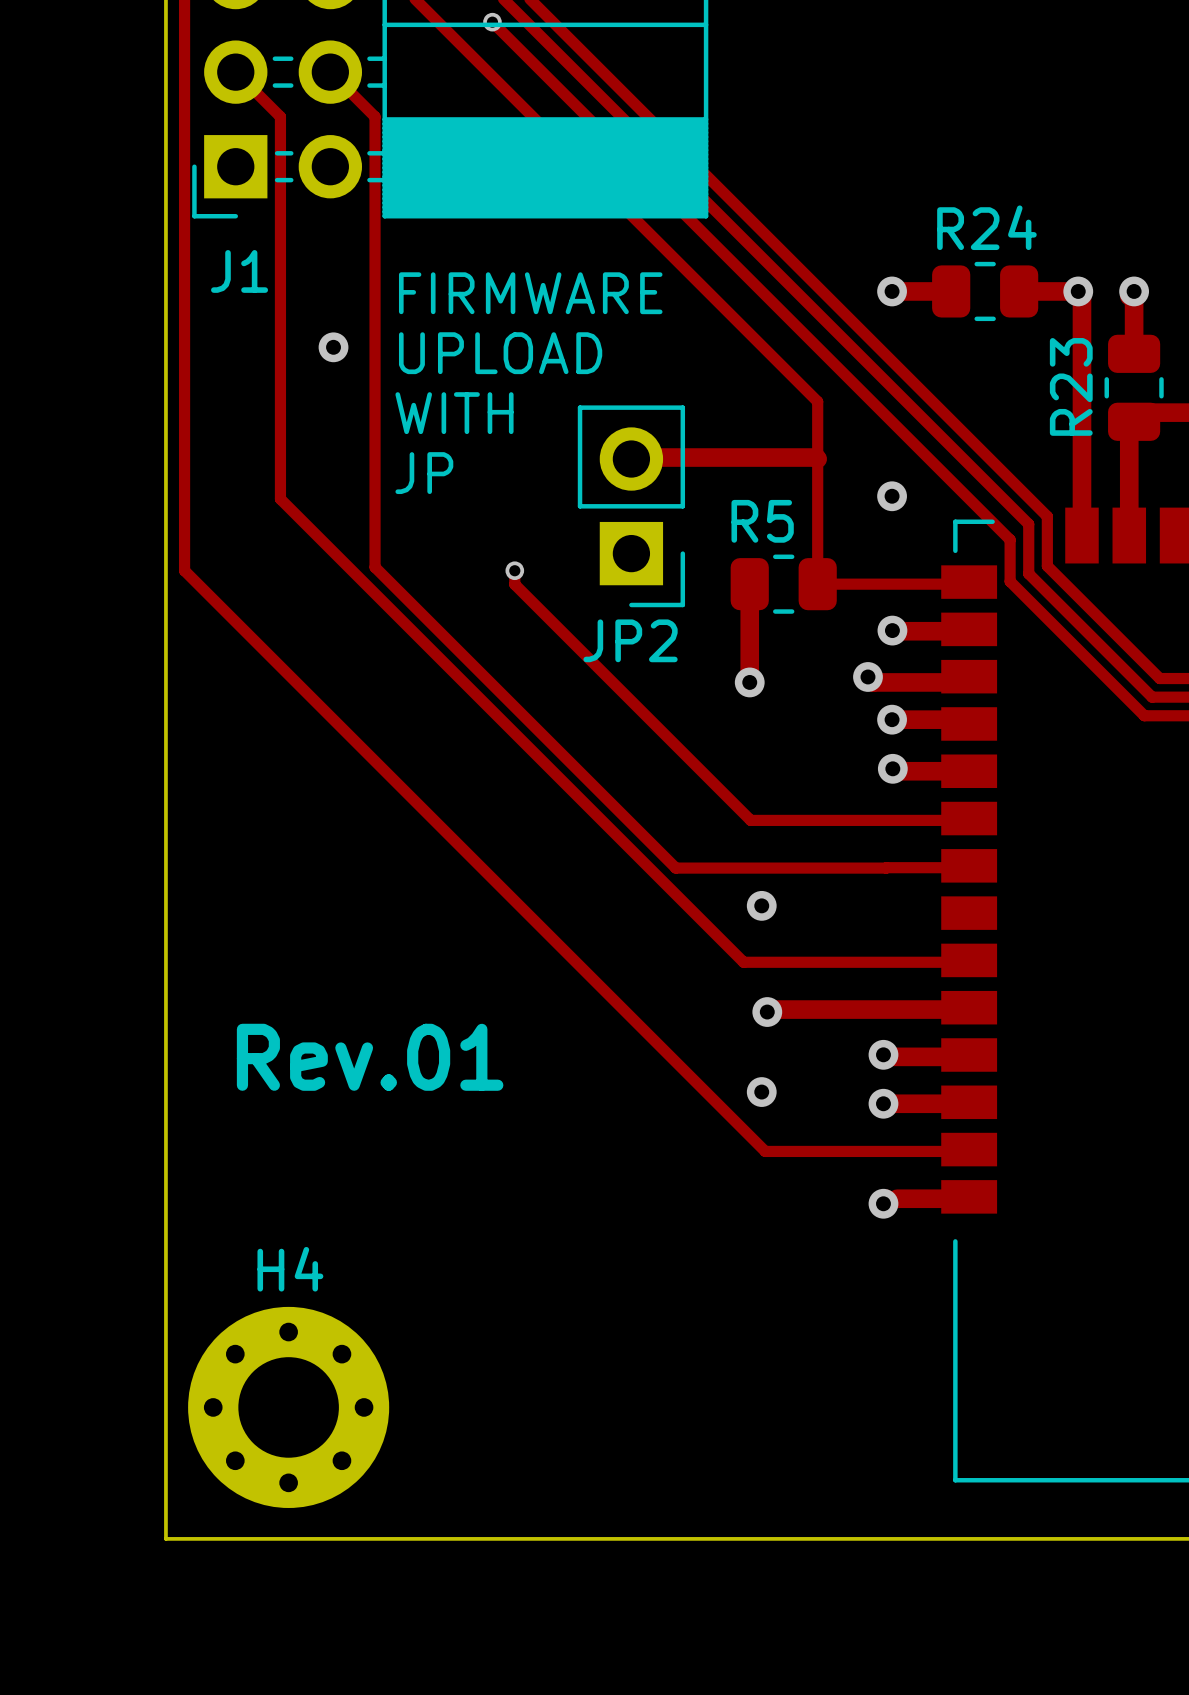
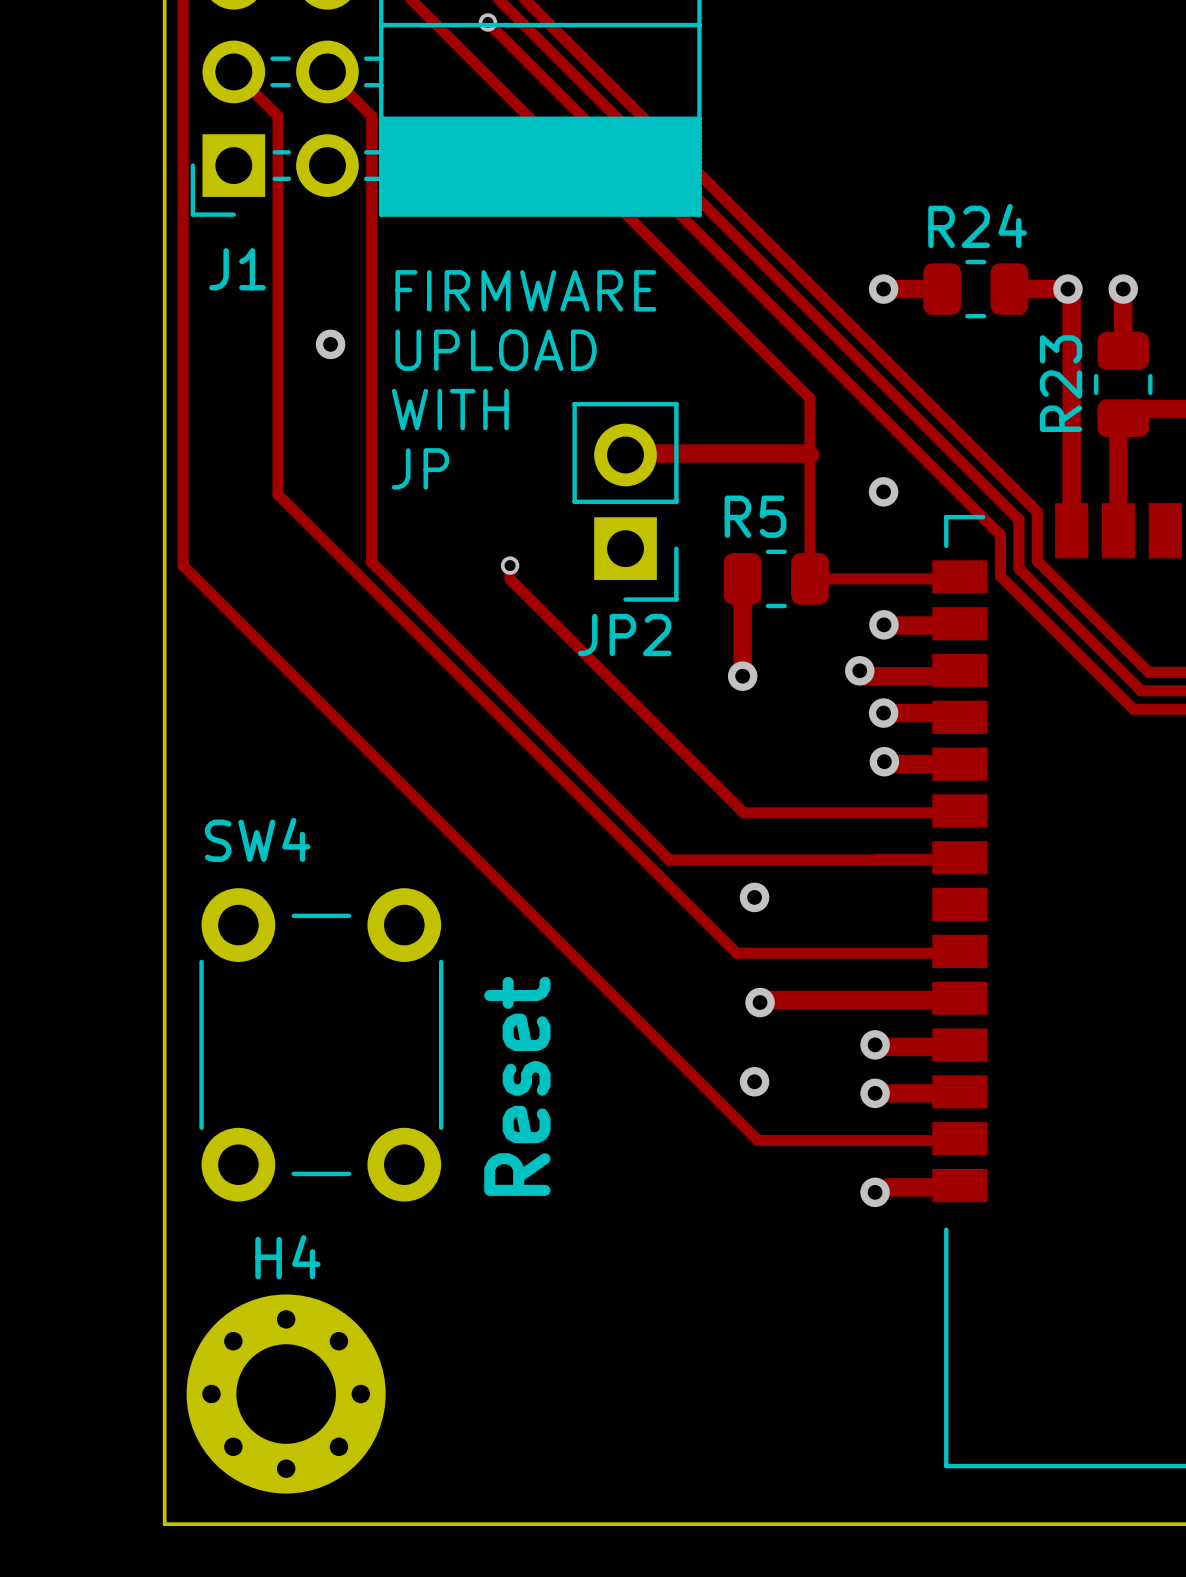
SW4: none -> (321, 1044)
text: Rev.01 (370, 1057) -> none
text: none -> Reset (517, 1086)

